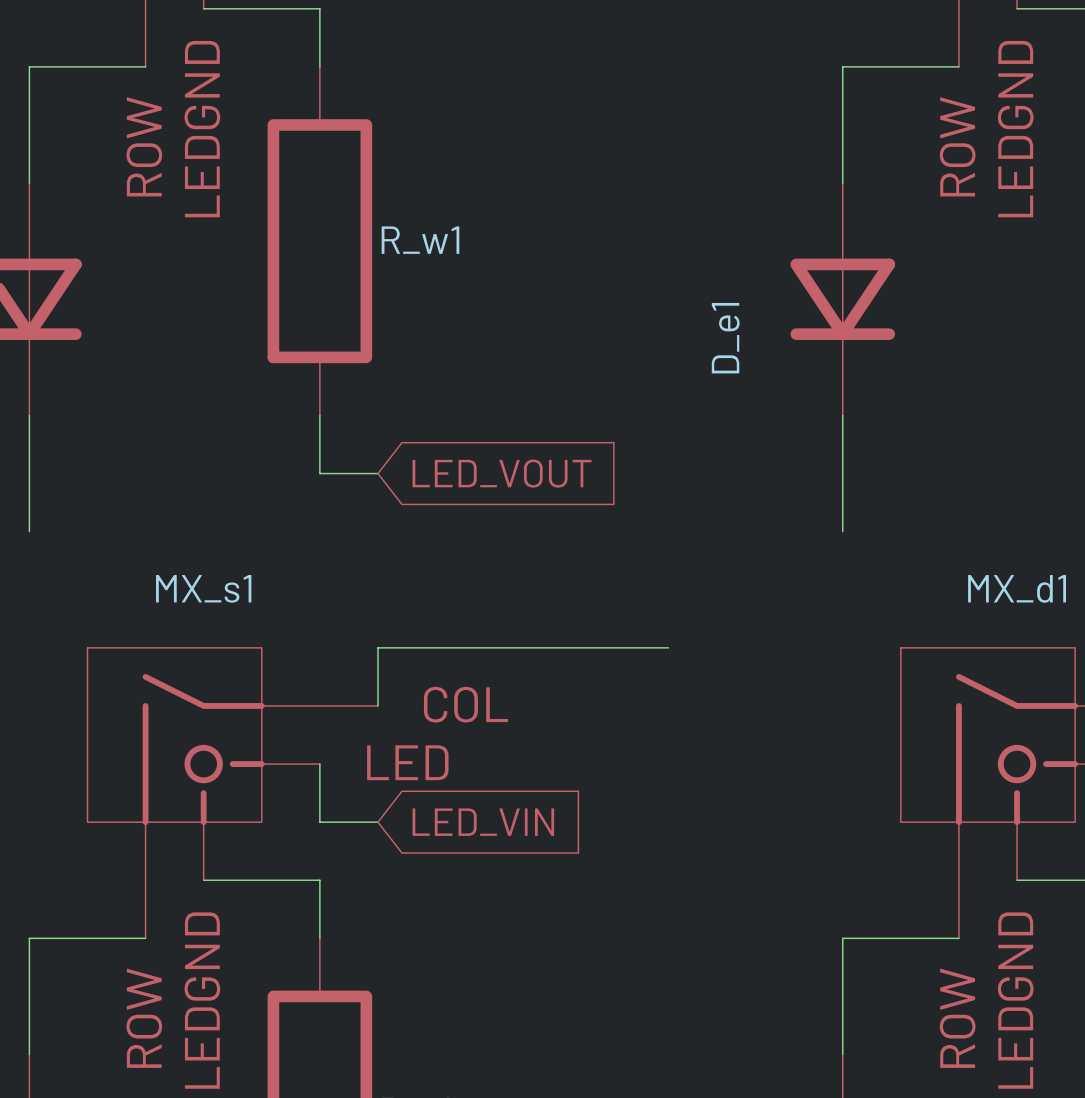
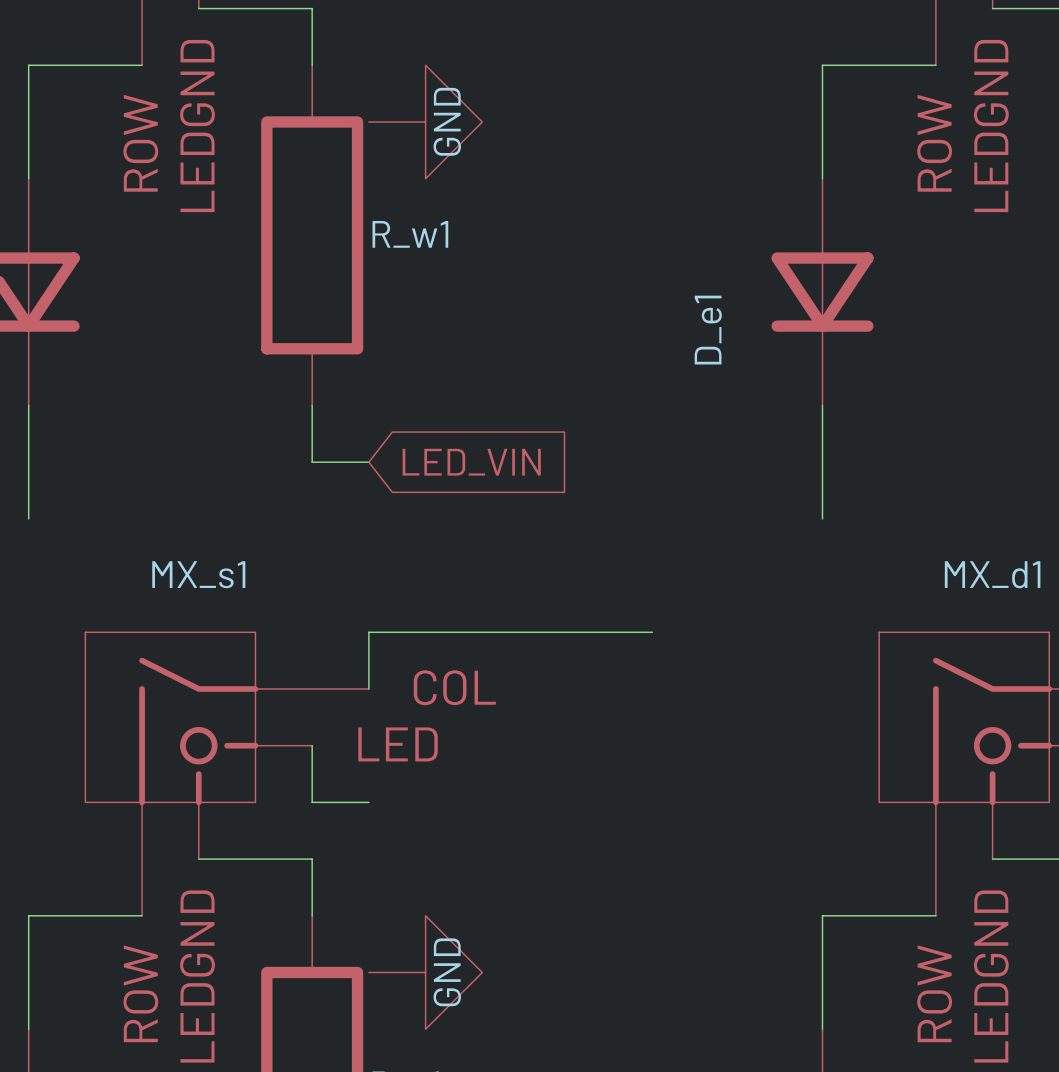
power symbol: none -> GND (425, 121)
global label: LED_VOUT (502, 473) -> LED_VIN (471, 462)
global label: LED_VIN (483, 822) -> none
power symbol: none -> GND (425, 972)

